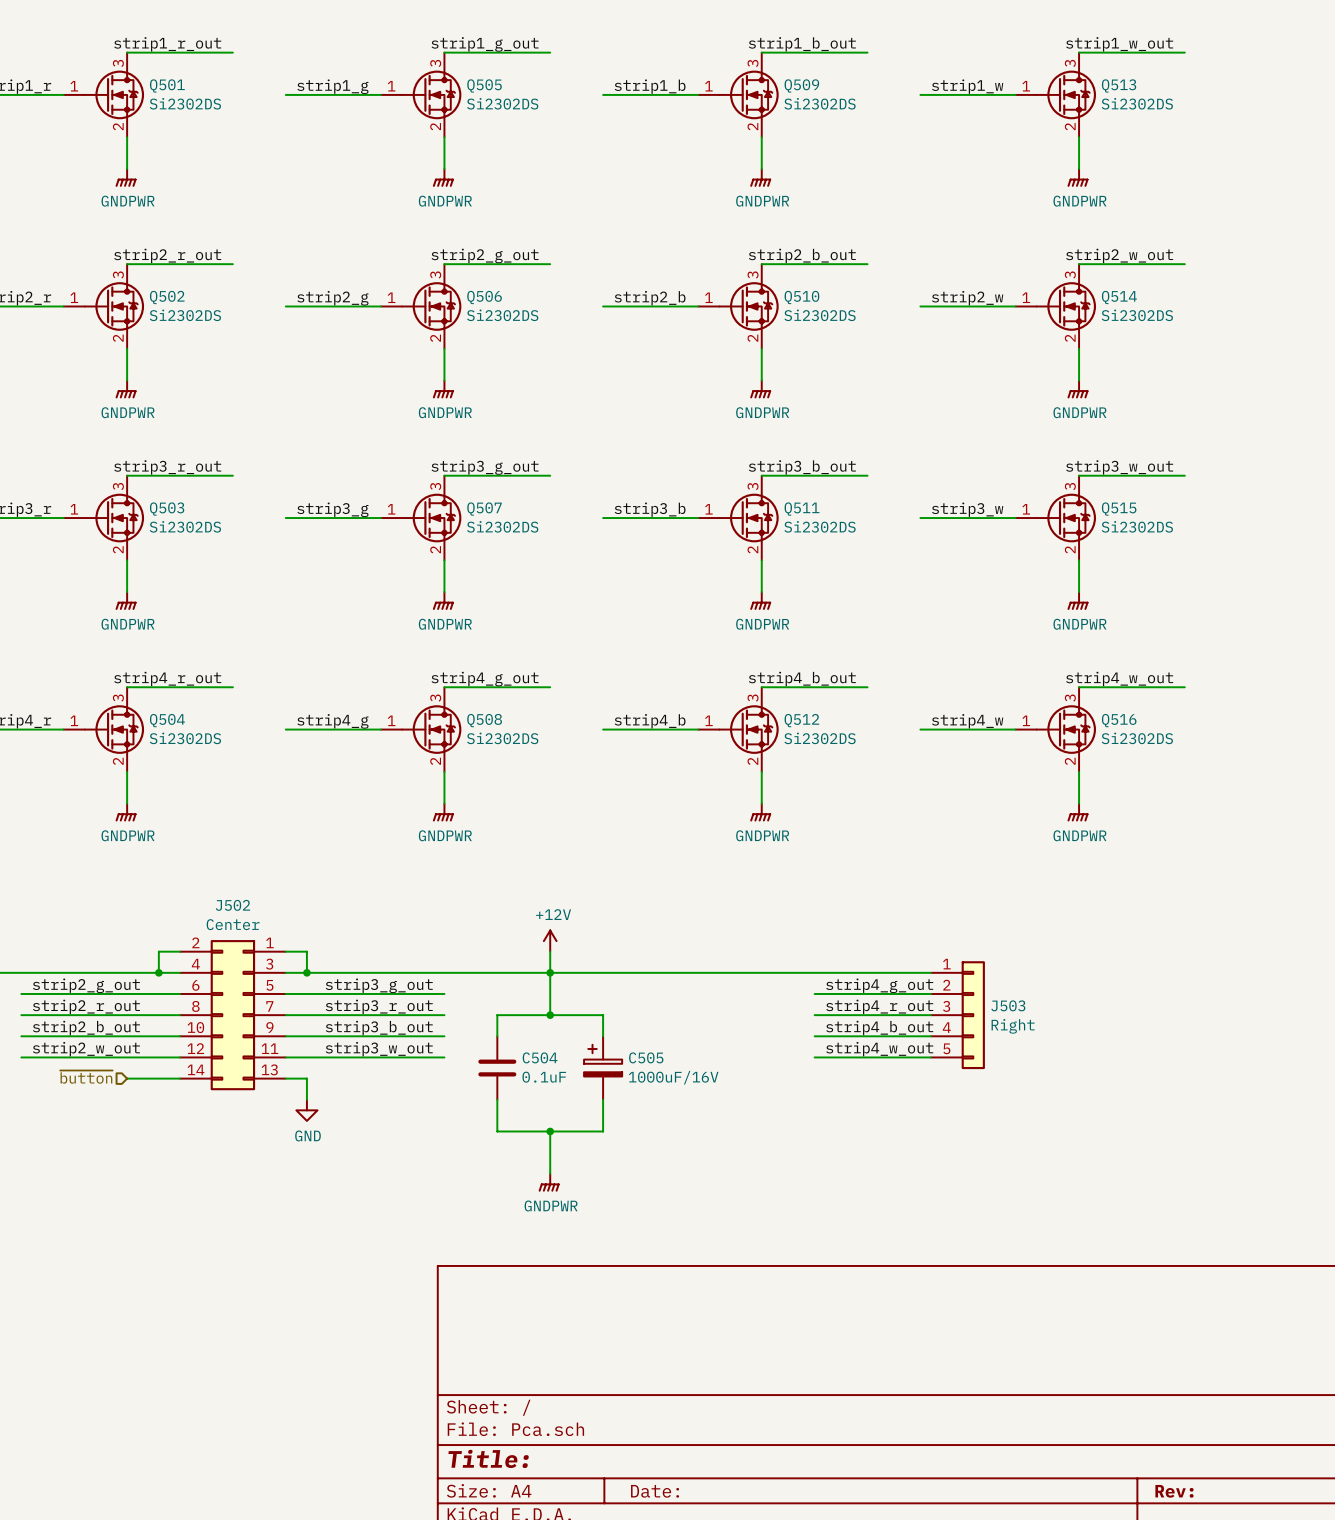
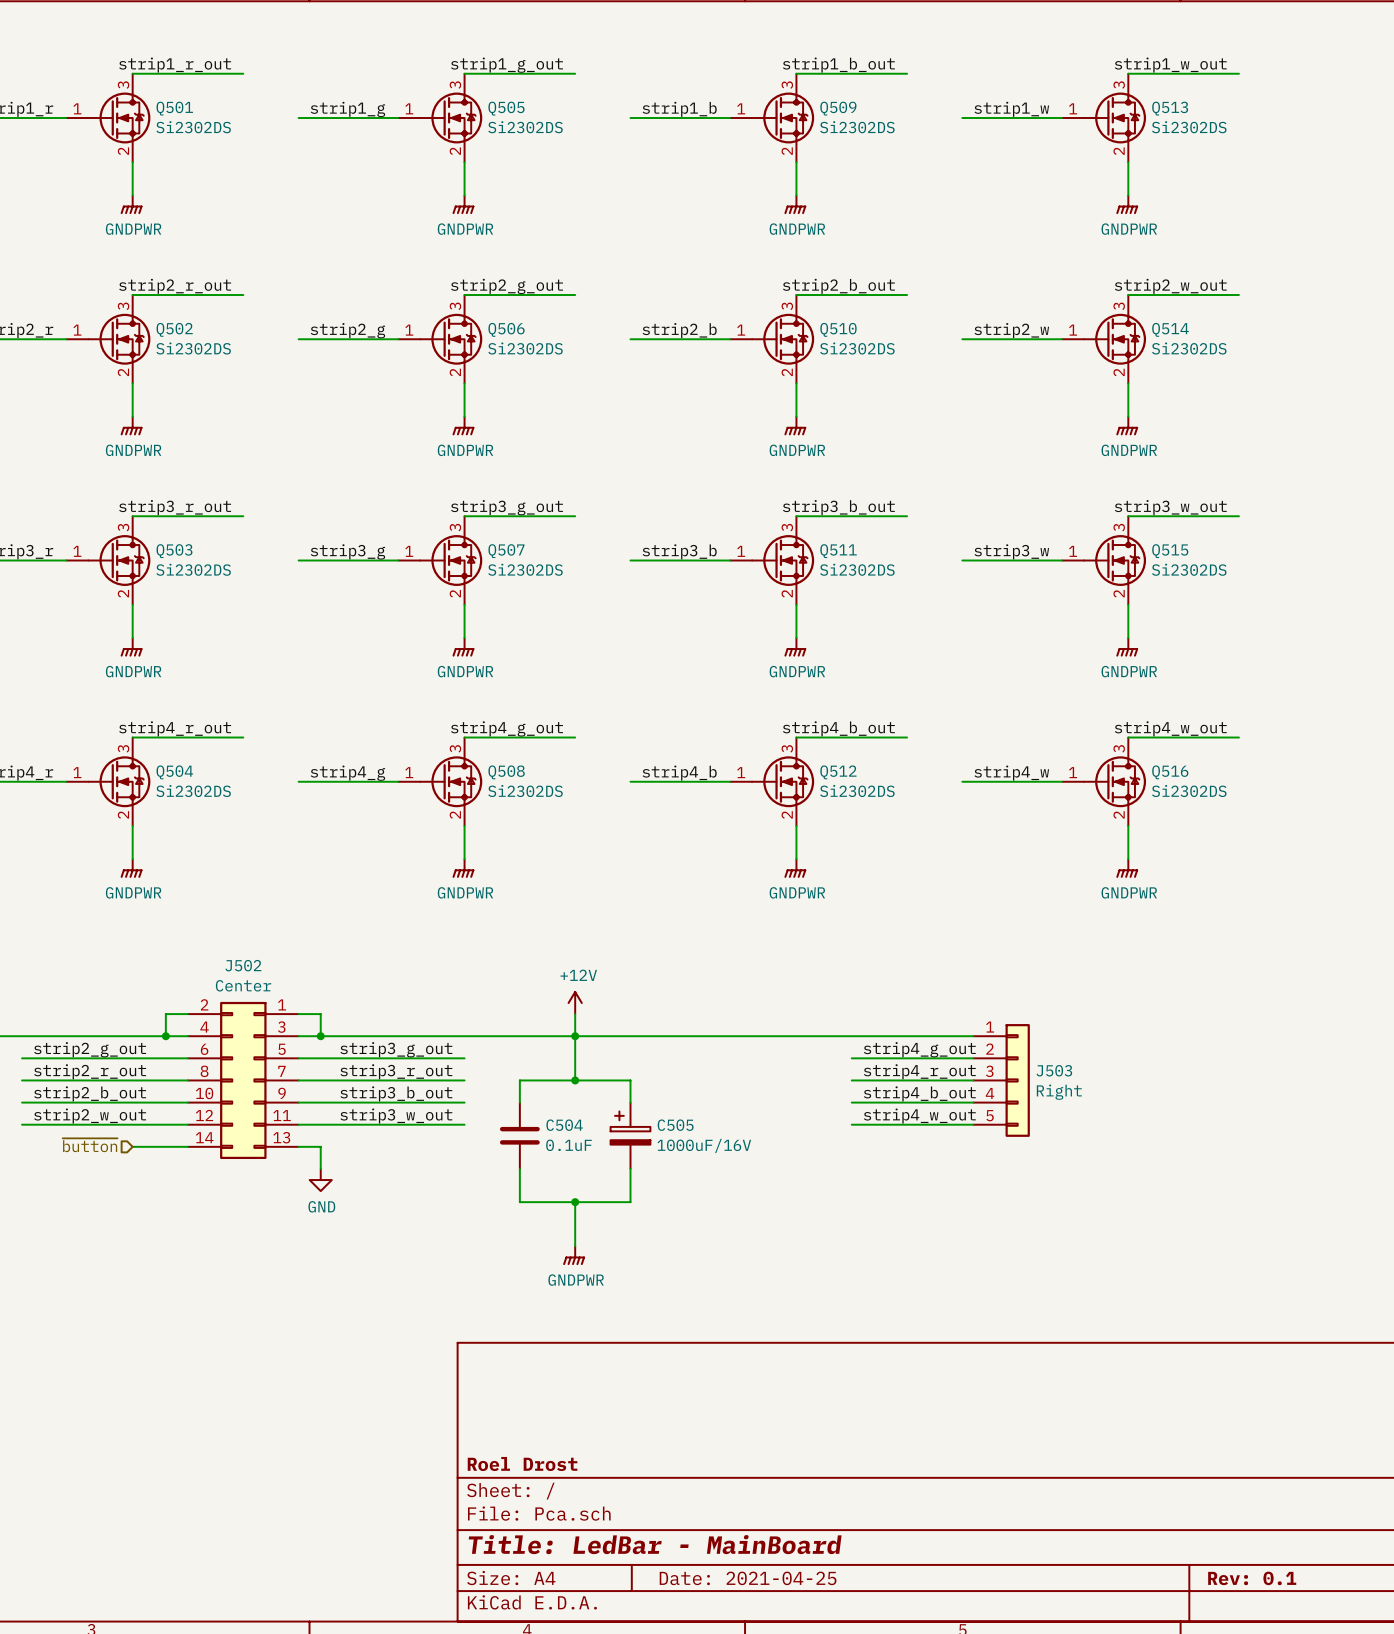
title block: none -> Roel Drost (522, 1463)
title block: Title: (488, 1458) -> Title: LedBar - MainBoard (655, 1544)
title block: Date: (655, 1491) -> Date: 2021-04-25 (748, 1578)
title block: Rev: (1174, 1491) -> Rev: 0.1 (1252, 1578)

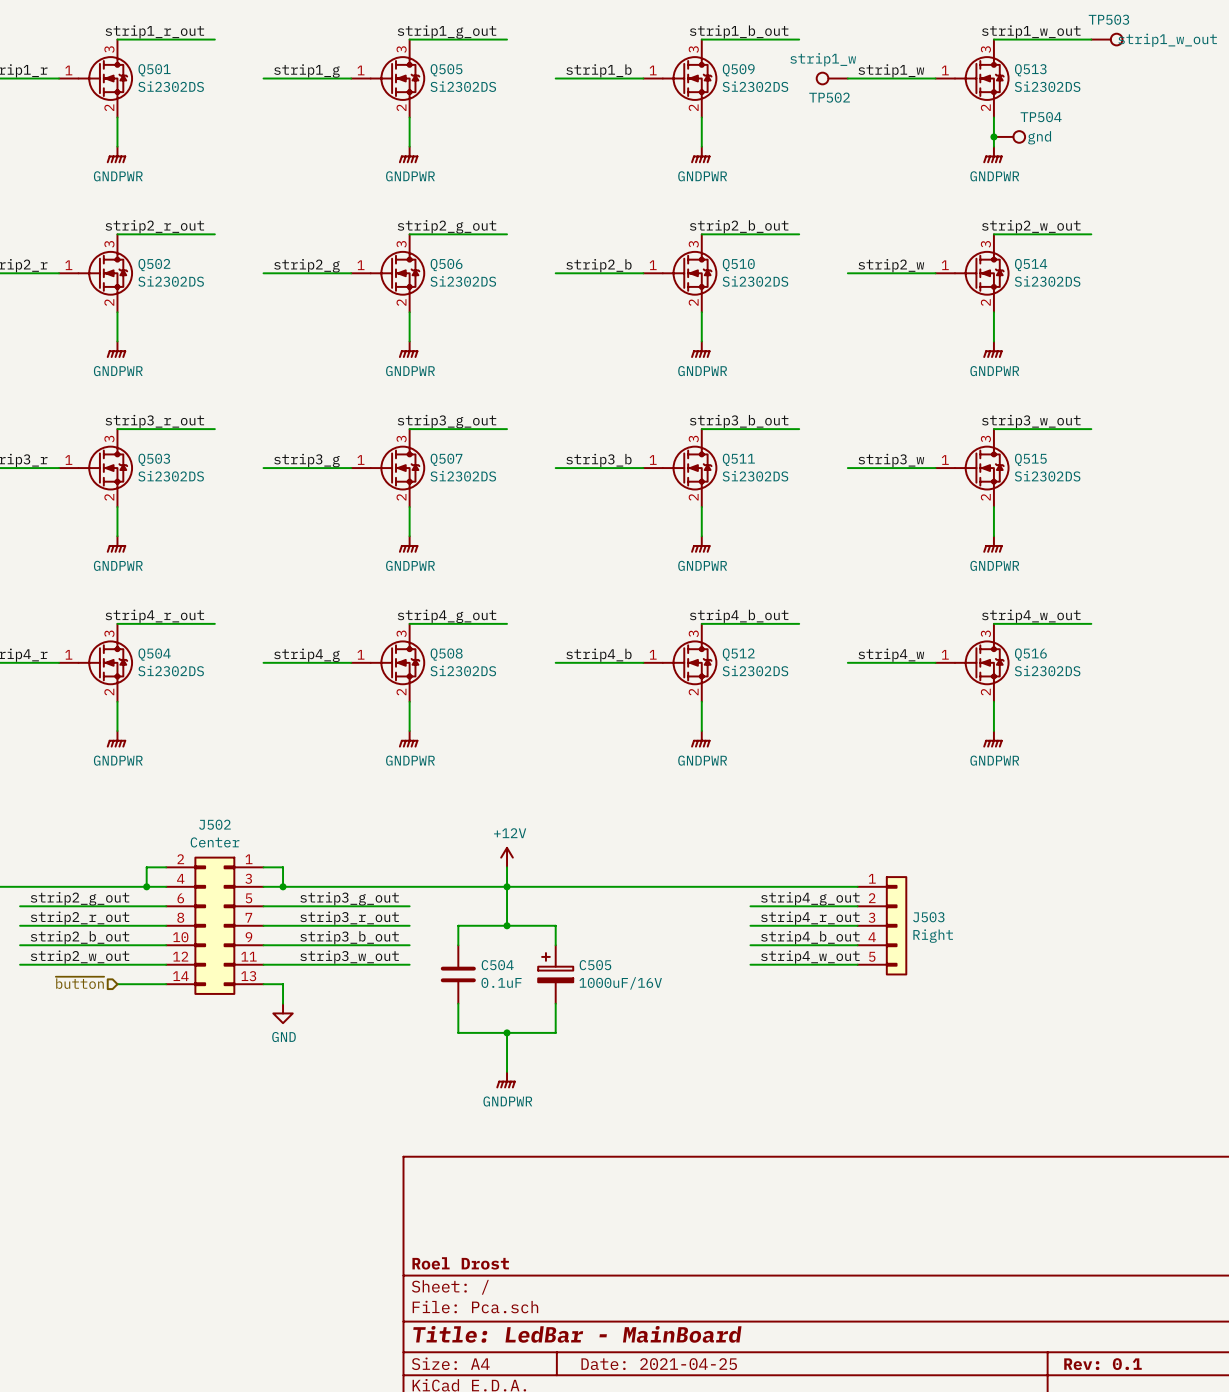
TP503: none -> strip1_w_out (1106, 39)
TP502: none -> strip1_w (832, 78)
junction: none -> (993, 136)
TP504: none -> gnd (1009, 136)

